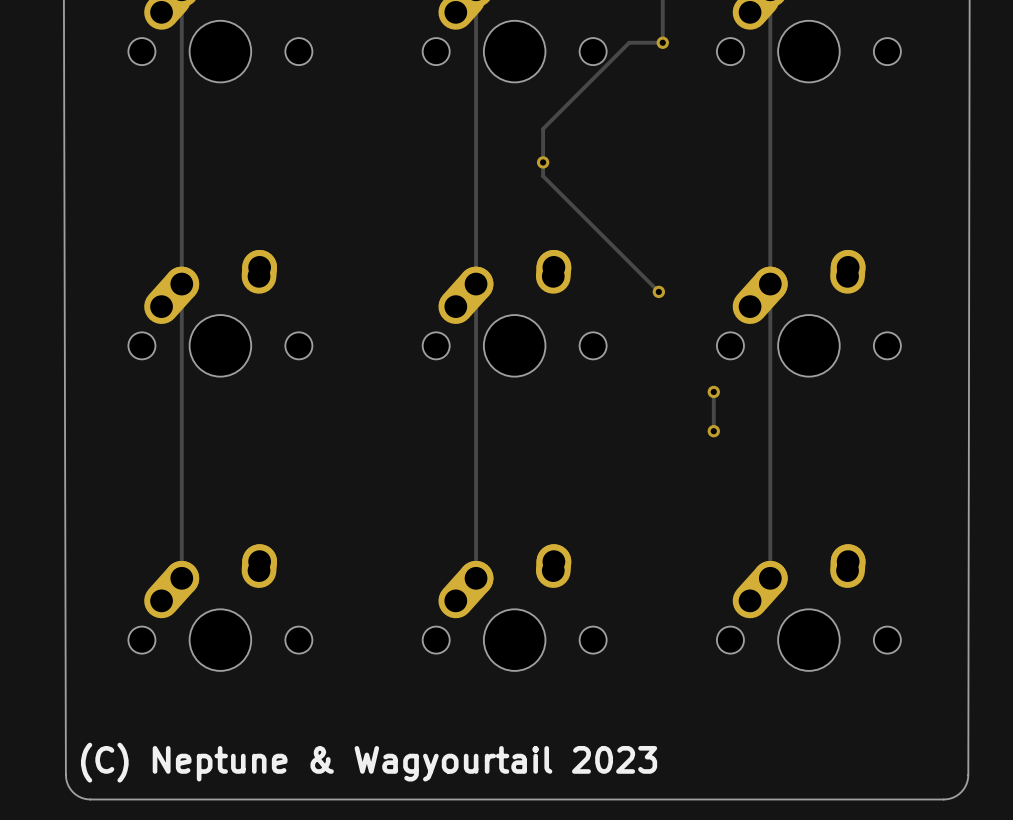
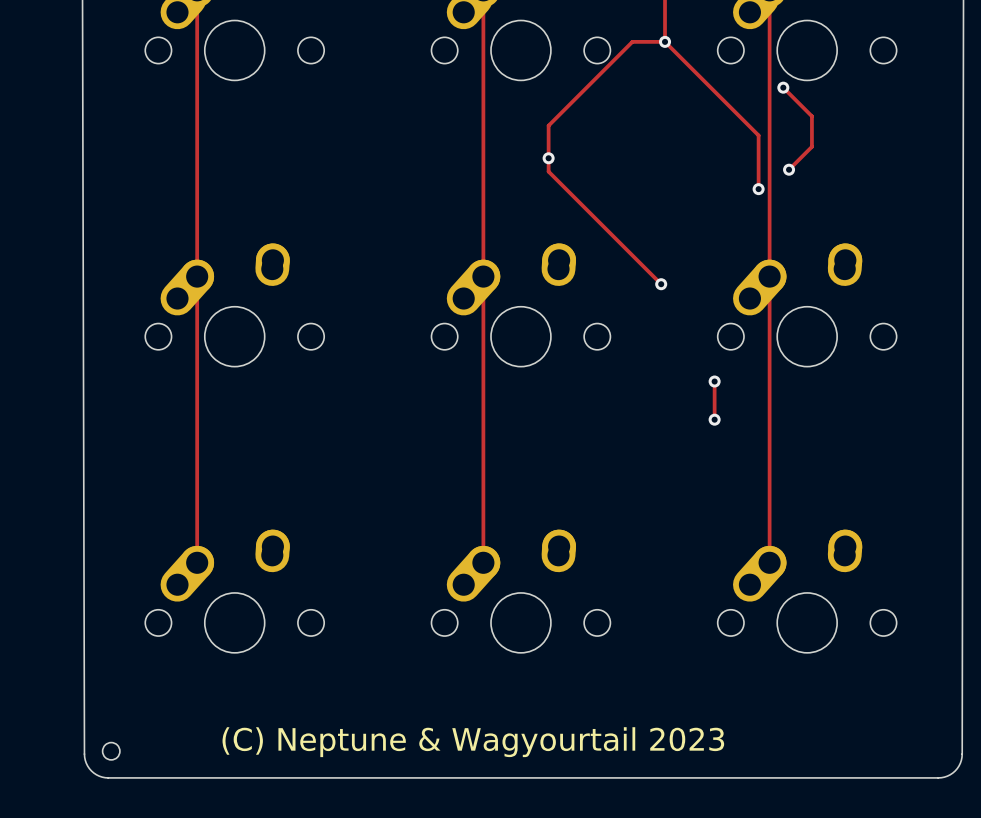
track: none -> (665, 41) (758, 135) (758, 189)
track: none -> (783, 87) (811, 116) (811, 146) (789, 169)
via: none -> (783, 87)
via: none -> (789, 169)
via: none -> (758, 189)
round board edge: none -> [101, 741, 121, 761]
text position: (C) Neptune & Wagyourtail 2023 (369, 762) -> (C) Neptune & Wagyourtail 2023 (473, 742)

